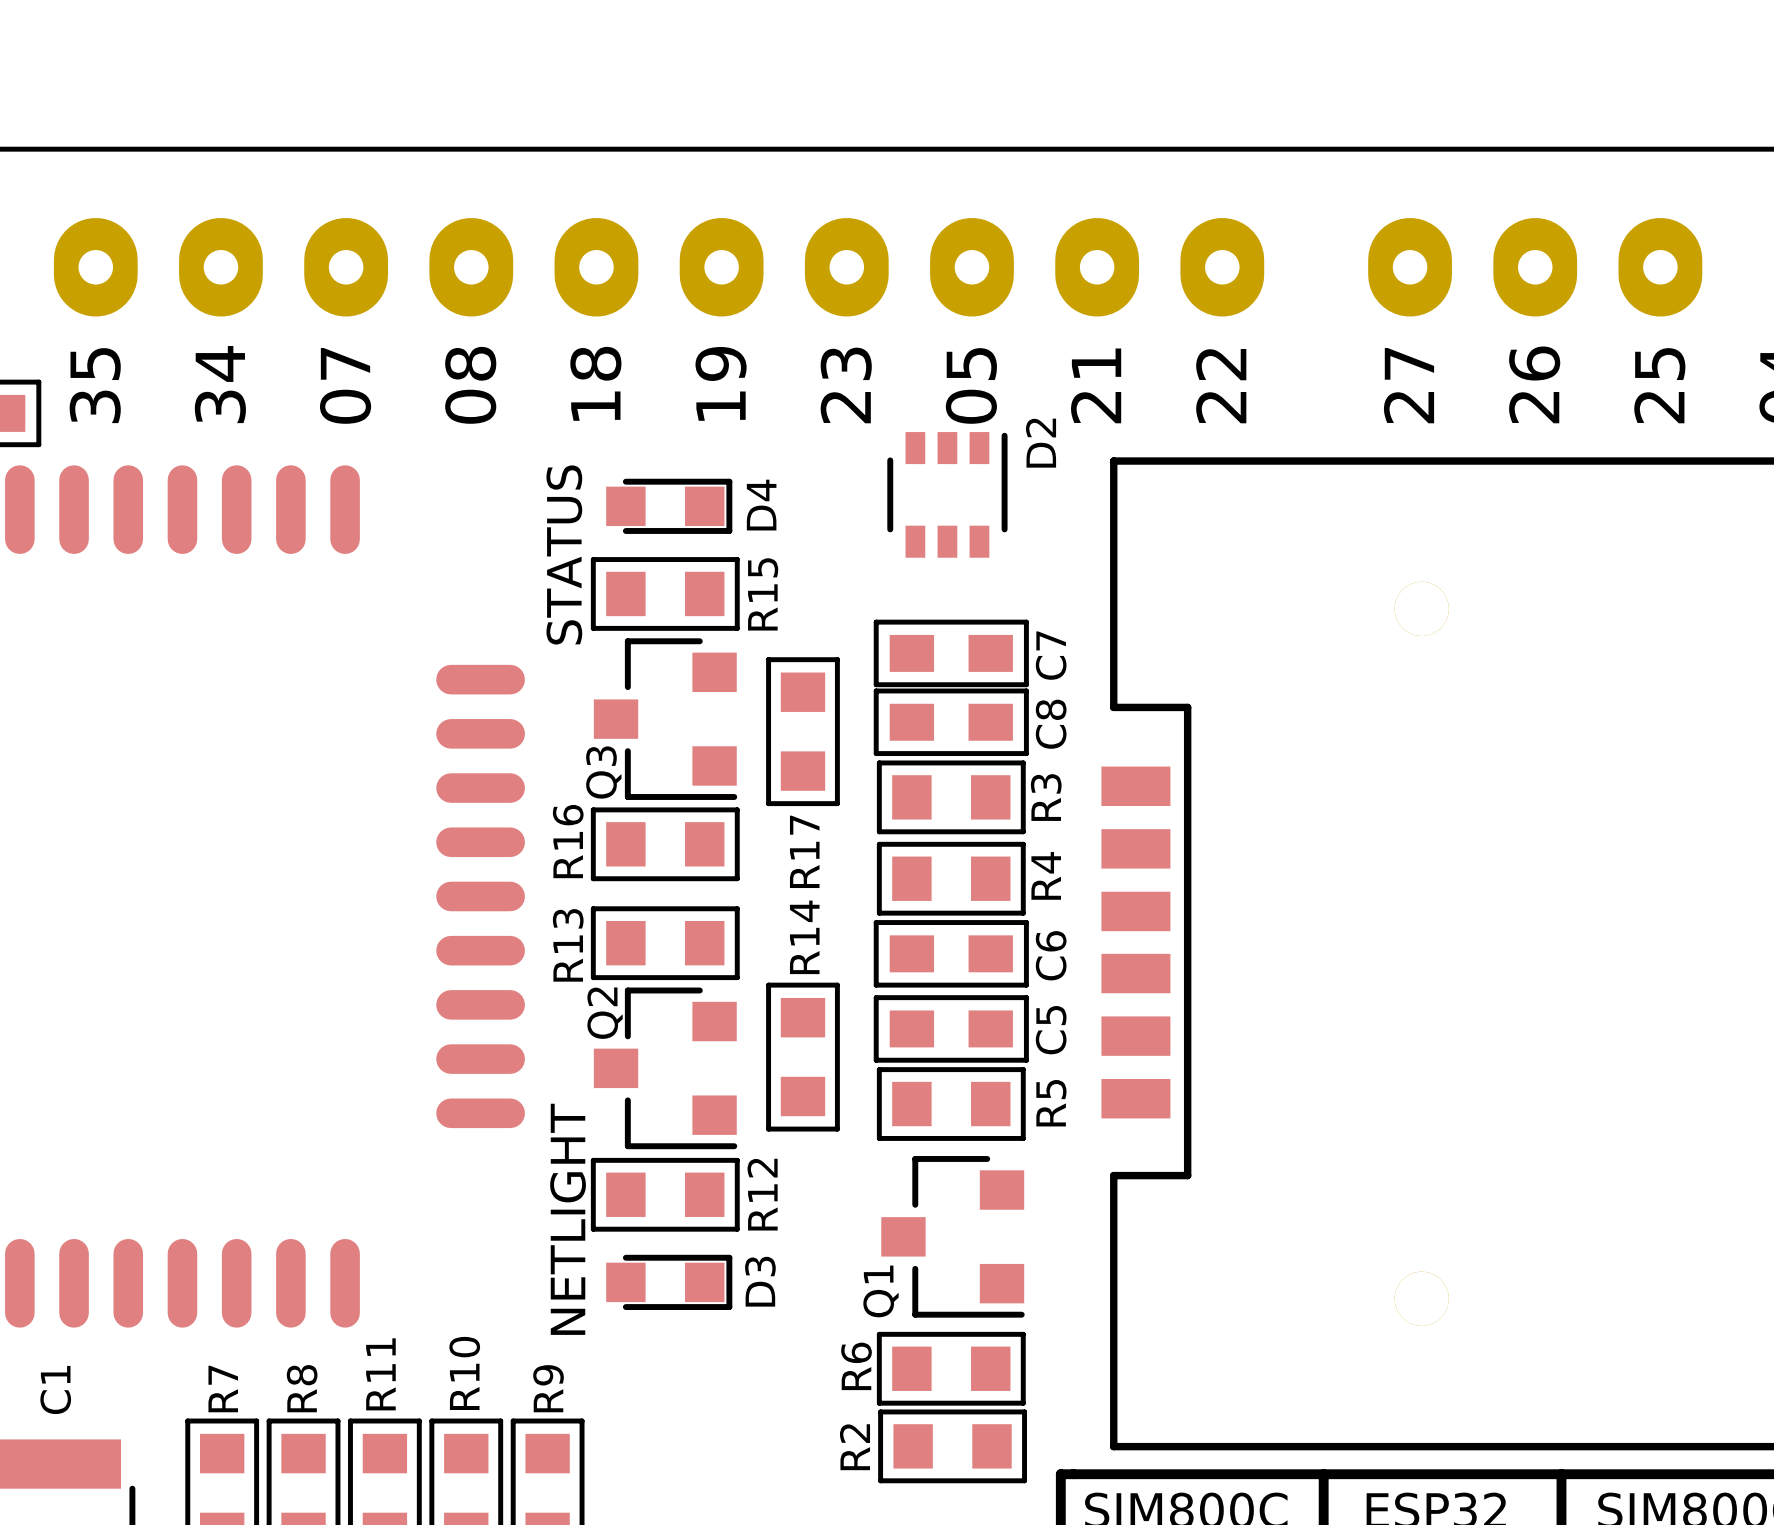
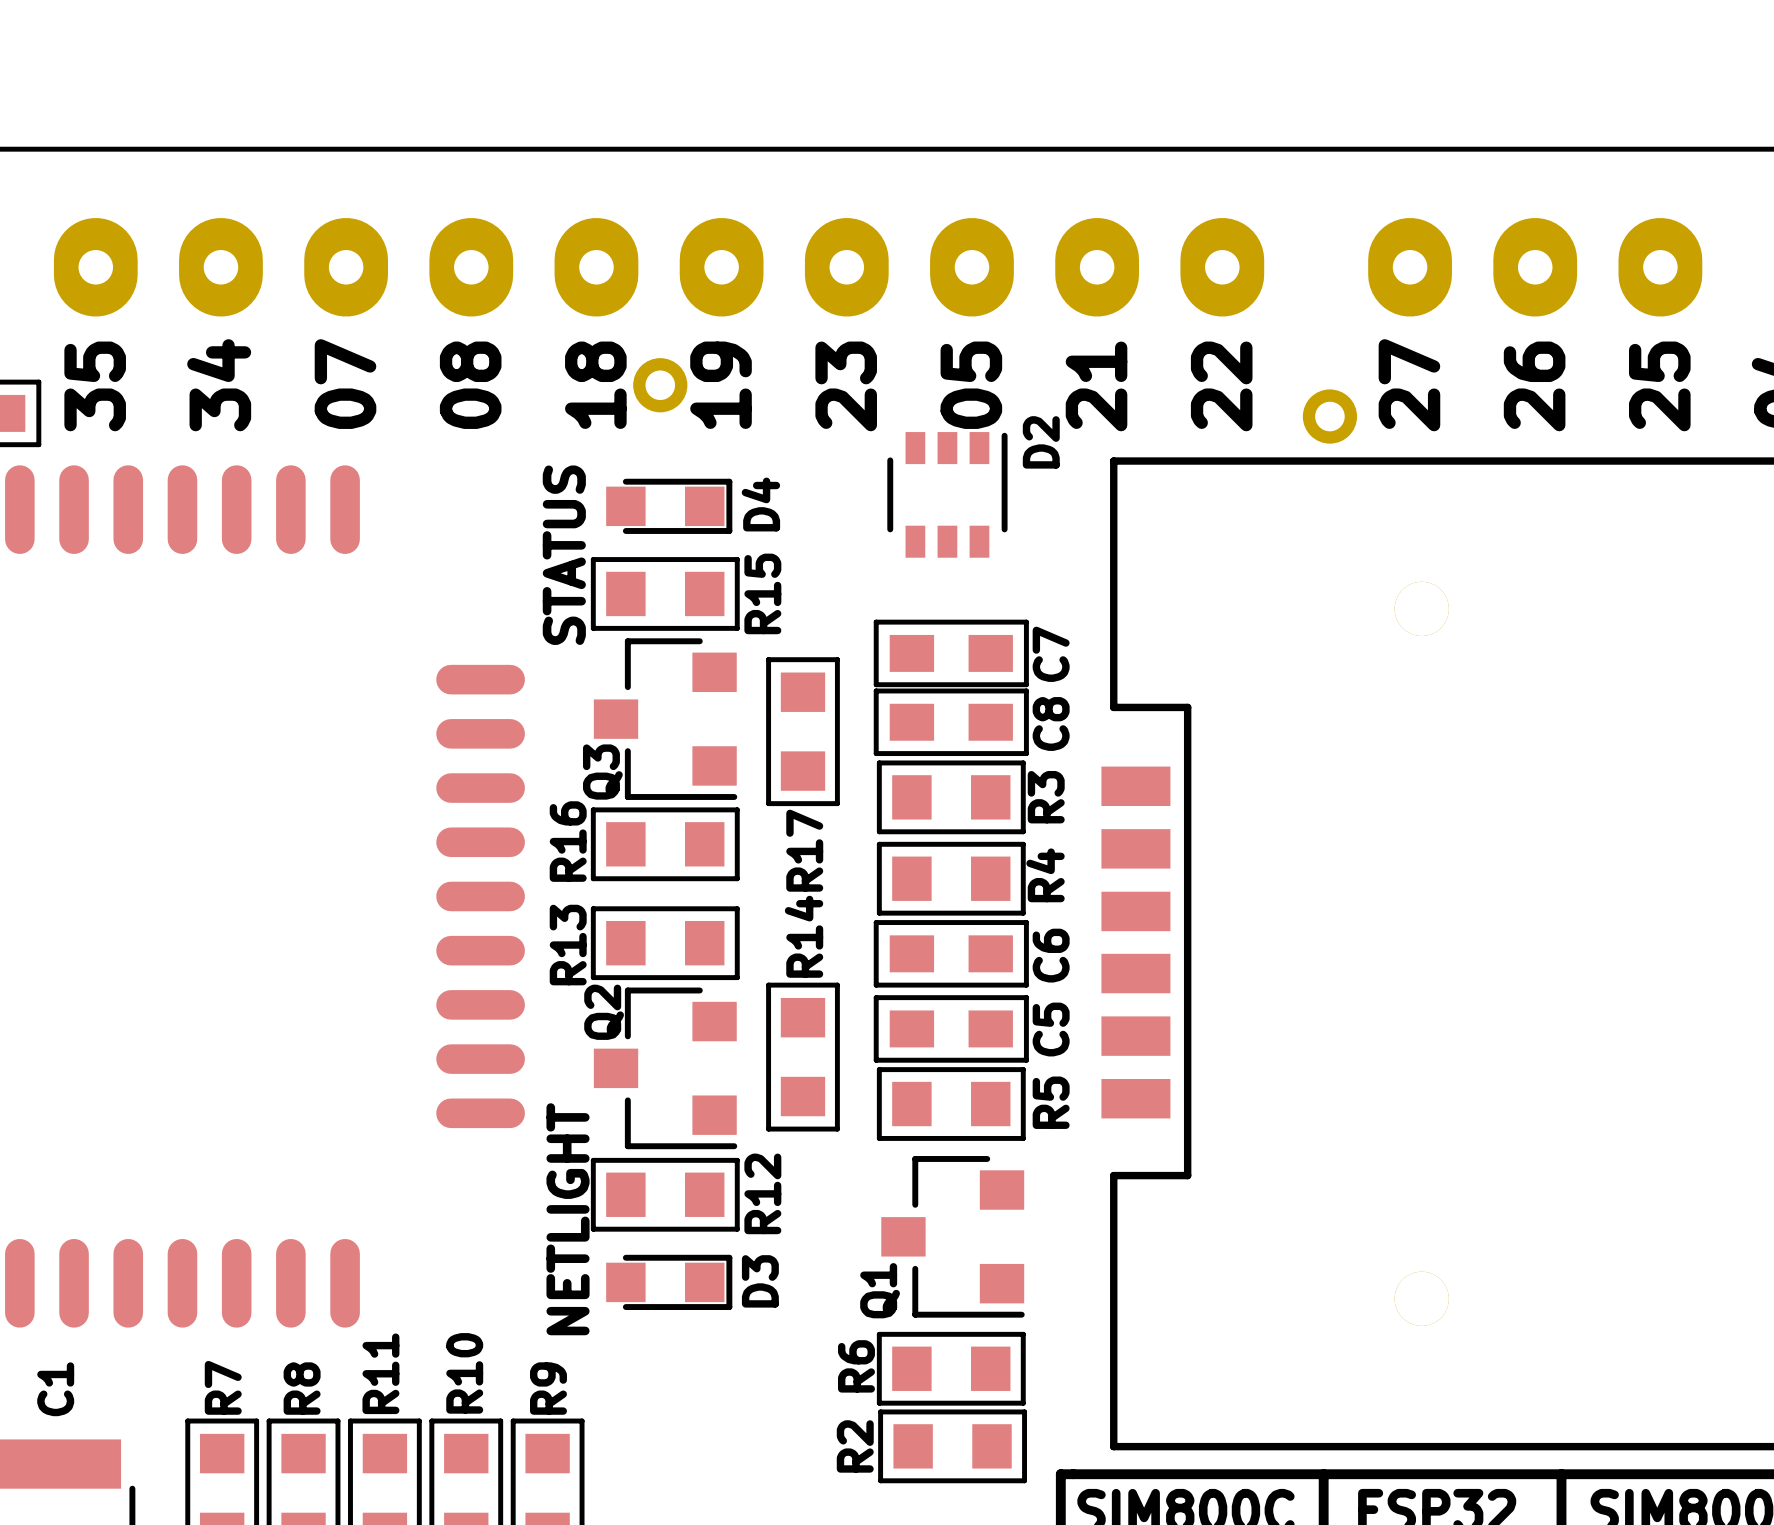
part: none -> (660, 385)
part: none -> (1329, 416)

